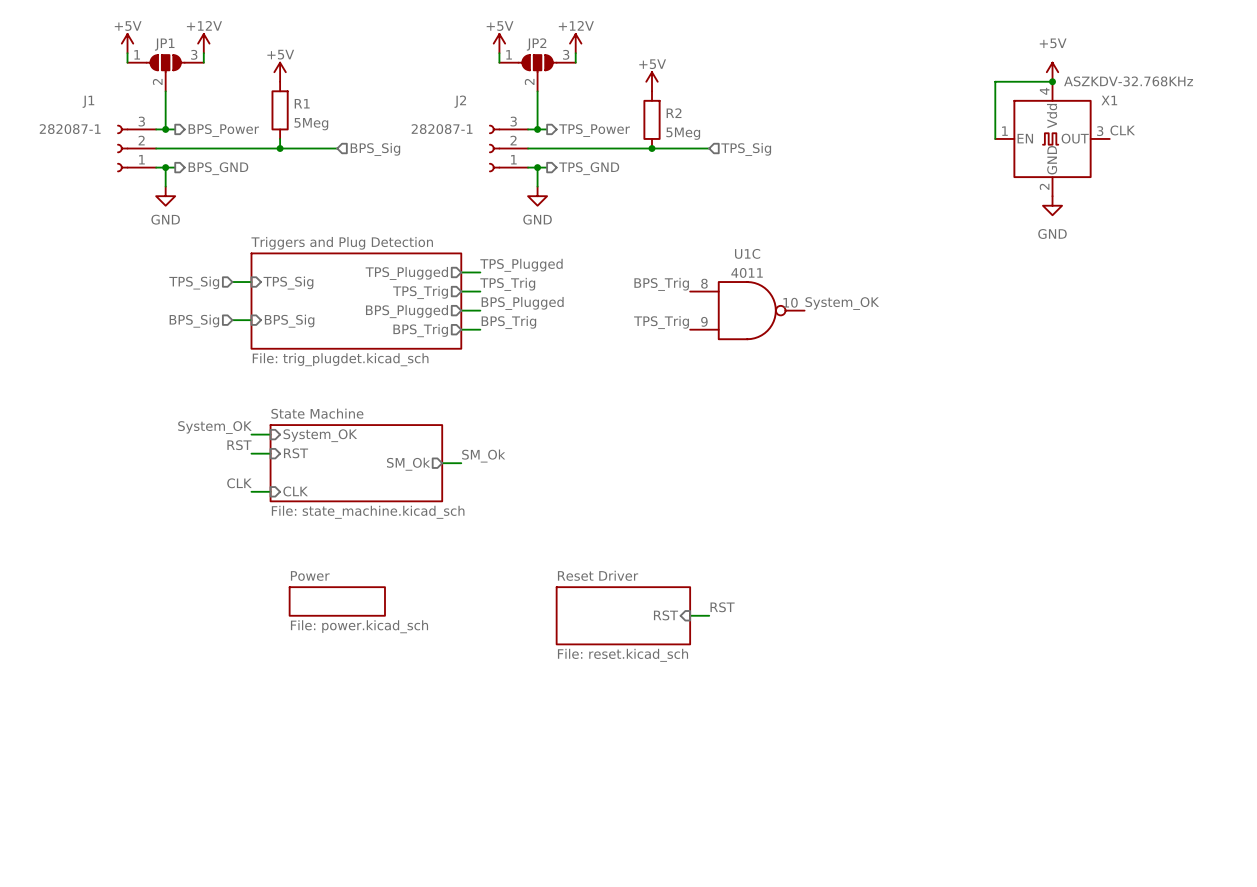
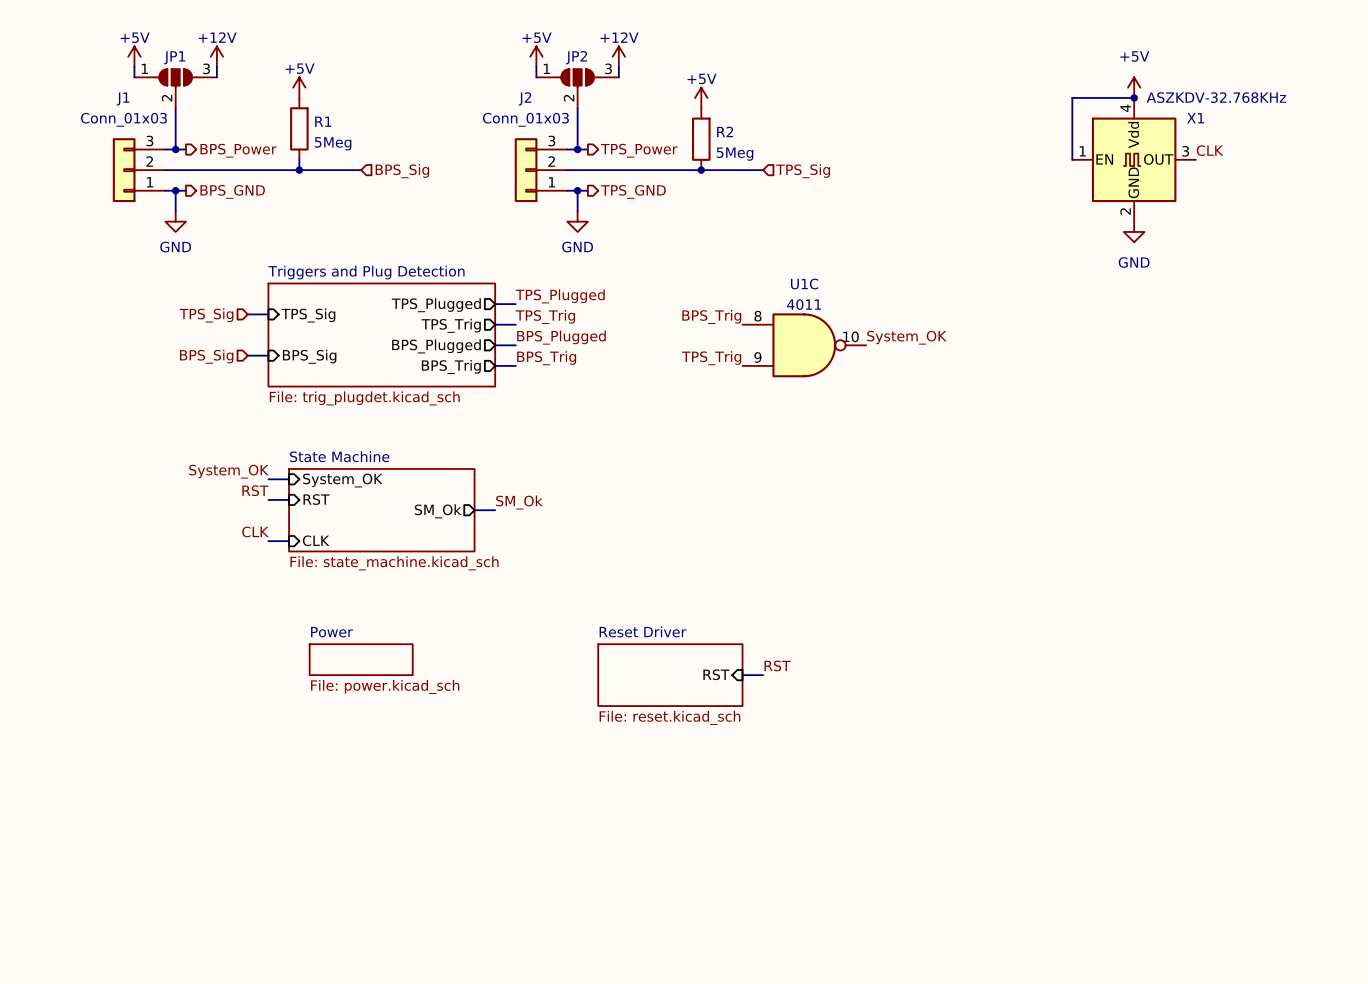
J1 name position: J1 (88, 101) -> J1 (123, 99)
J2 name position: J2 (460, 101) -> J2 (525, 98)
J1 symbol: [117, 125, 157, 172] -> [112, 138, 166, 203]
J2 symbol: [489, 125, 529, 172] -> [514, 138, 568, 203]
J1 value: 282087-1 (70, 129) -> Conn_01x03 (123, 119)
J2 value: 282087-1 (442, 129) -> Conn_01x03 (525, 119)

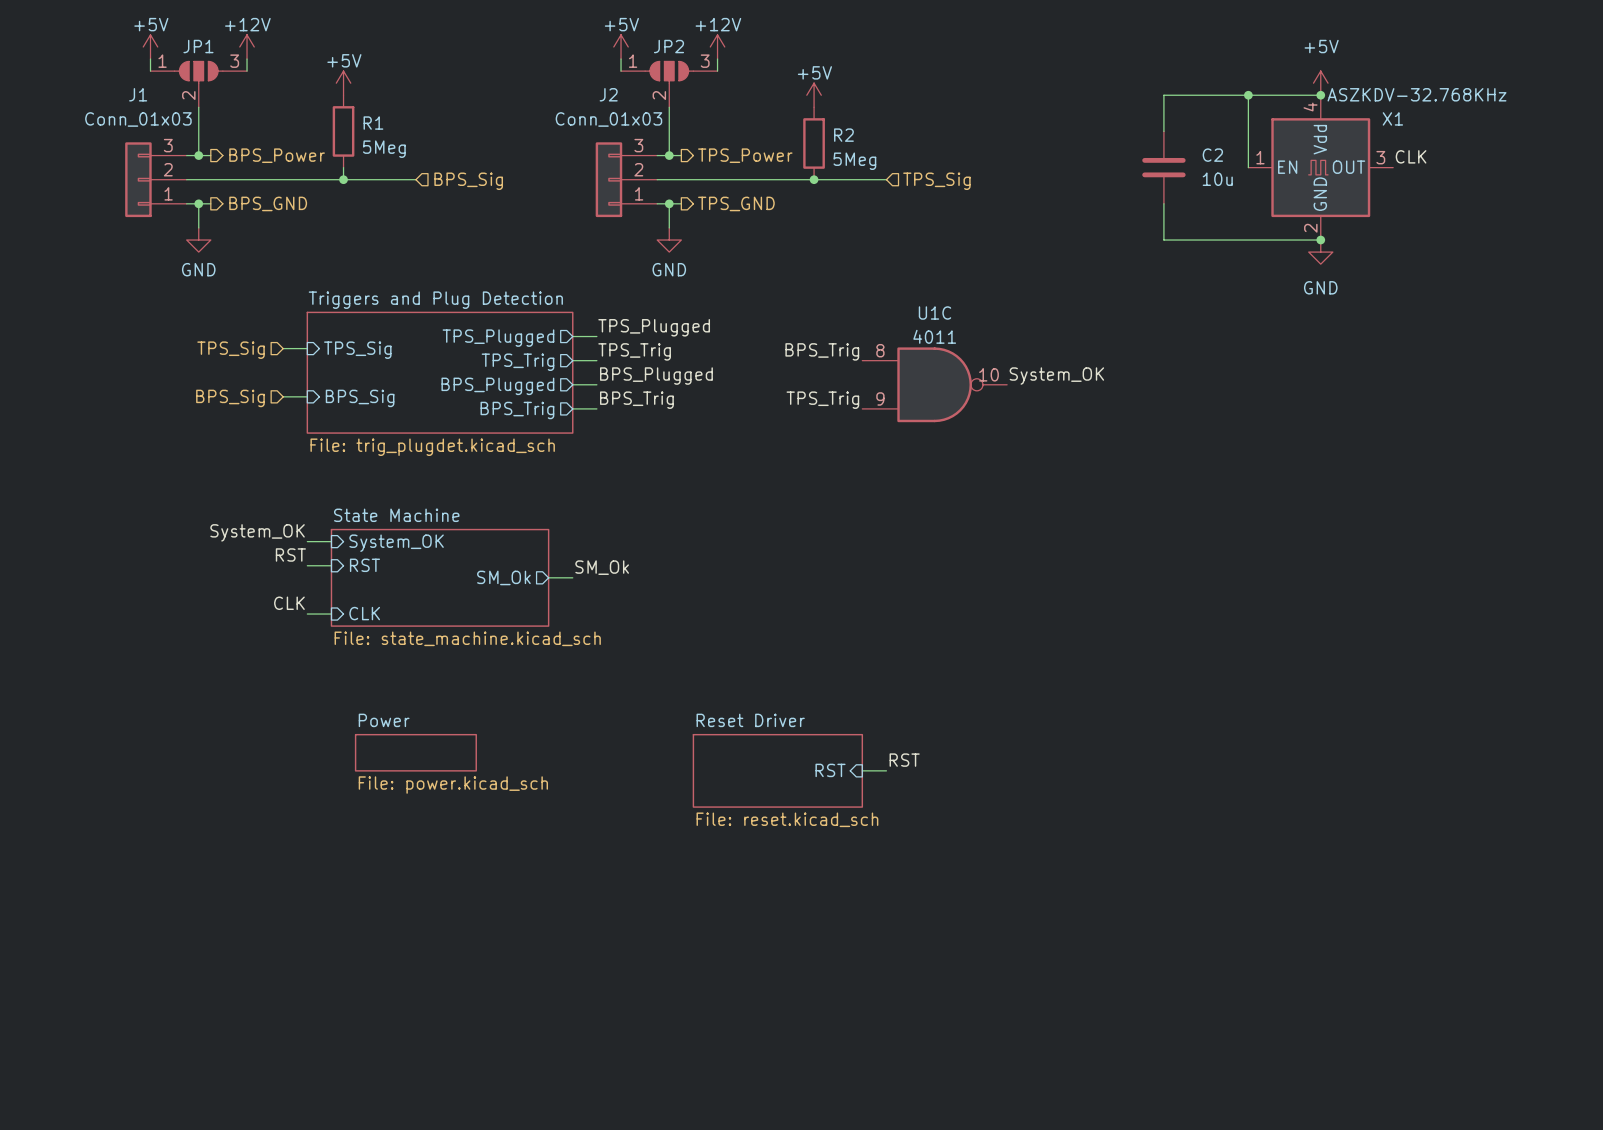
wire: none -> (1248, 95) (1163, 95) (1163, 131)
junction: none -> (1248, 95)
C2: none -> 10u (1163, 167)
wire: none -> (1163, 203) (1163, 240) (1320, 240)
junction: none -> (1320, 240)

